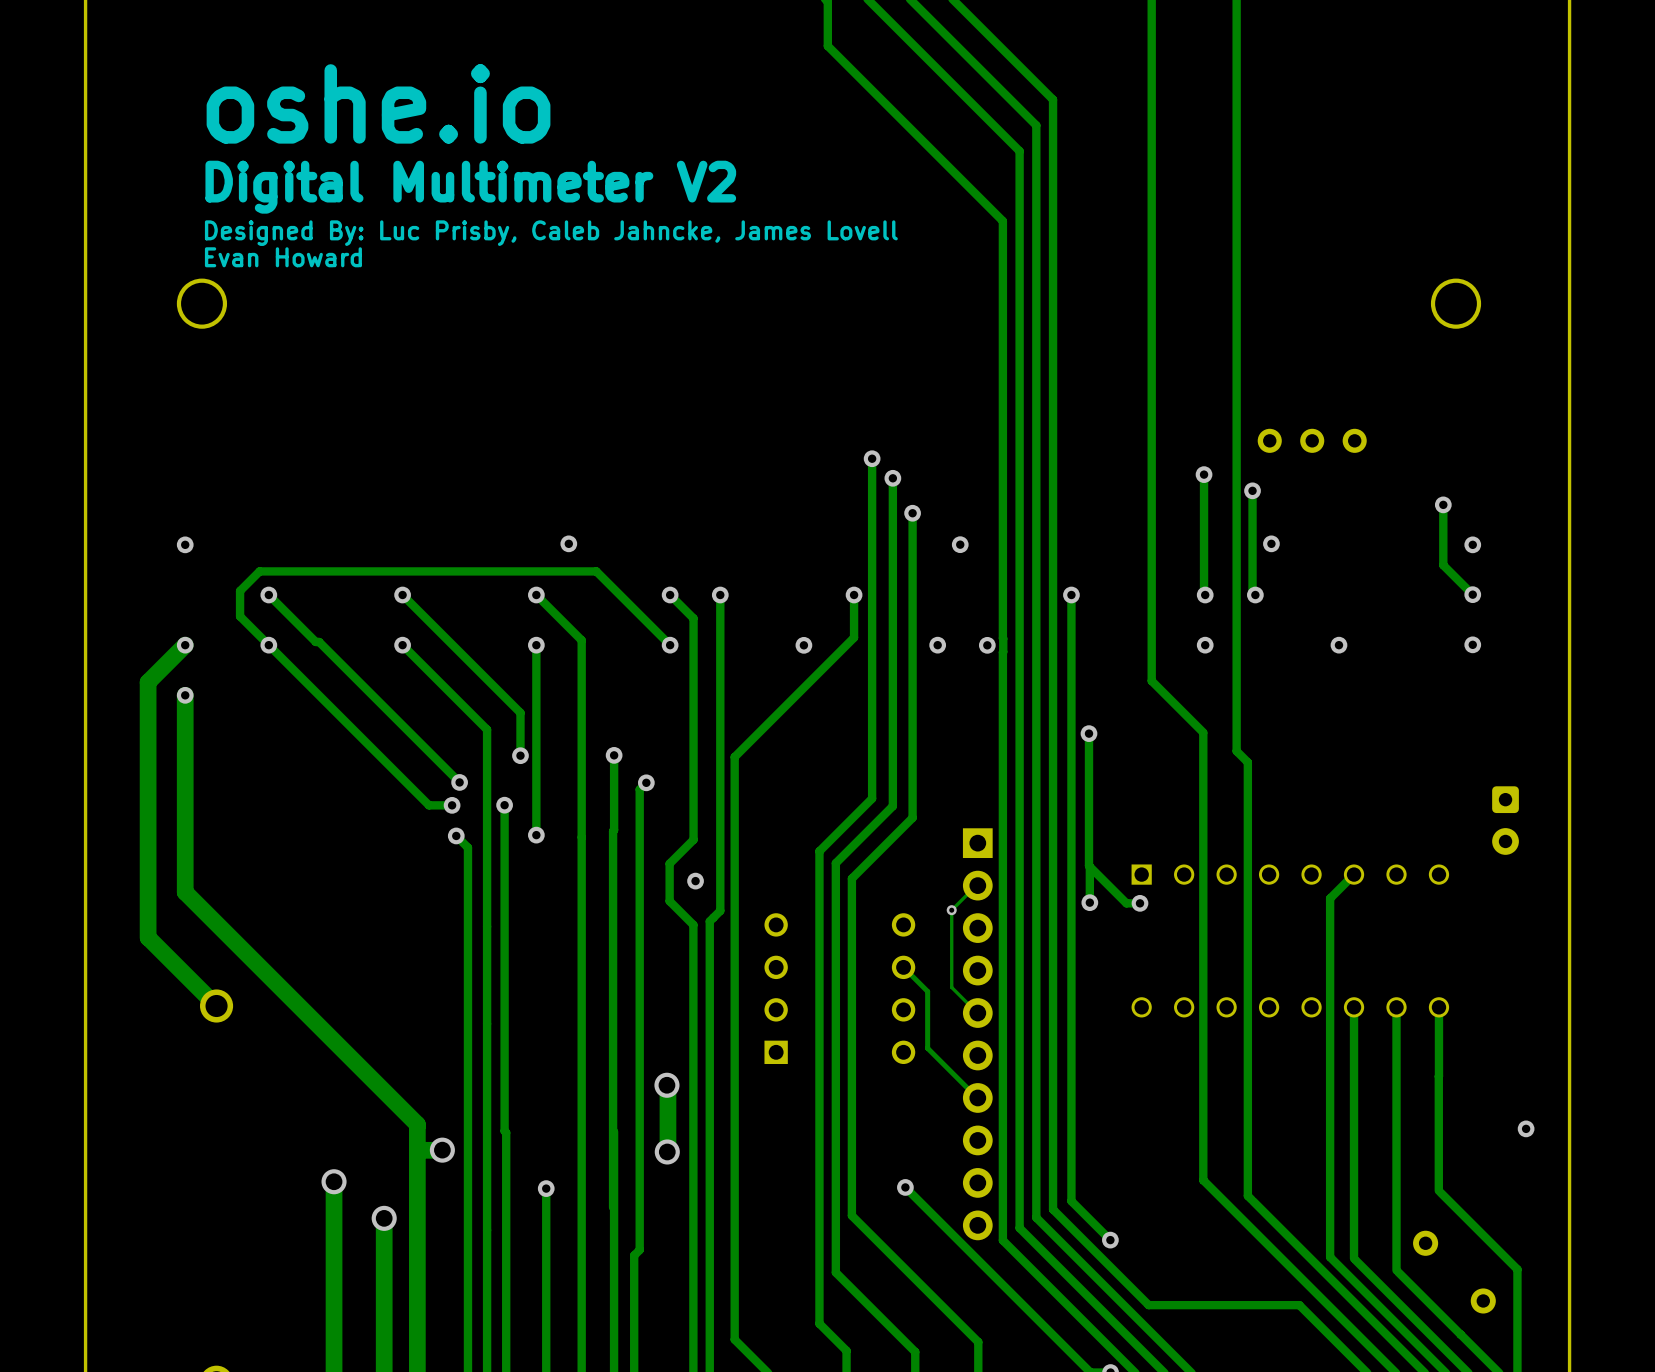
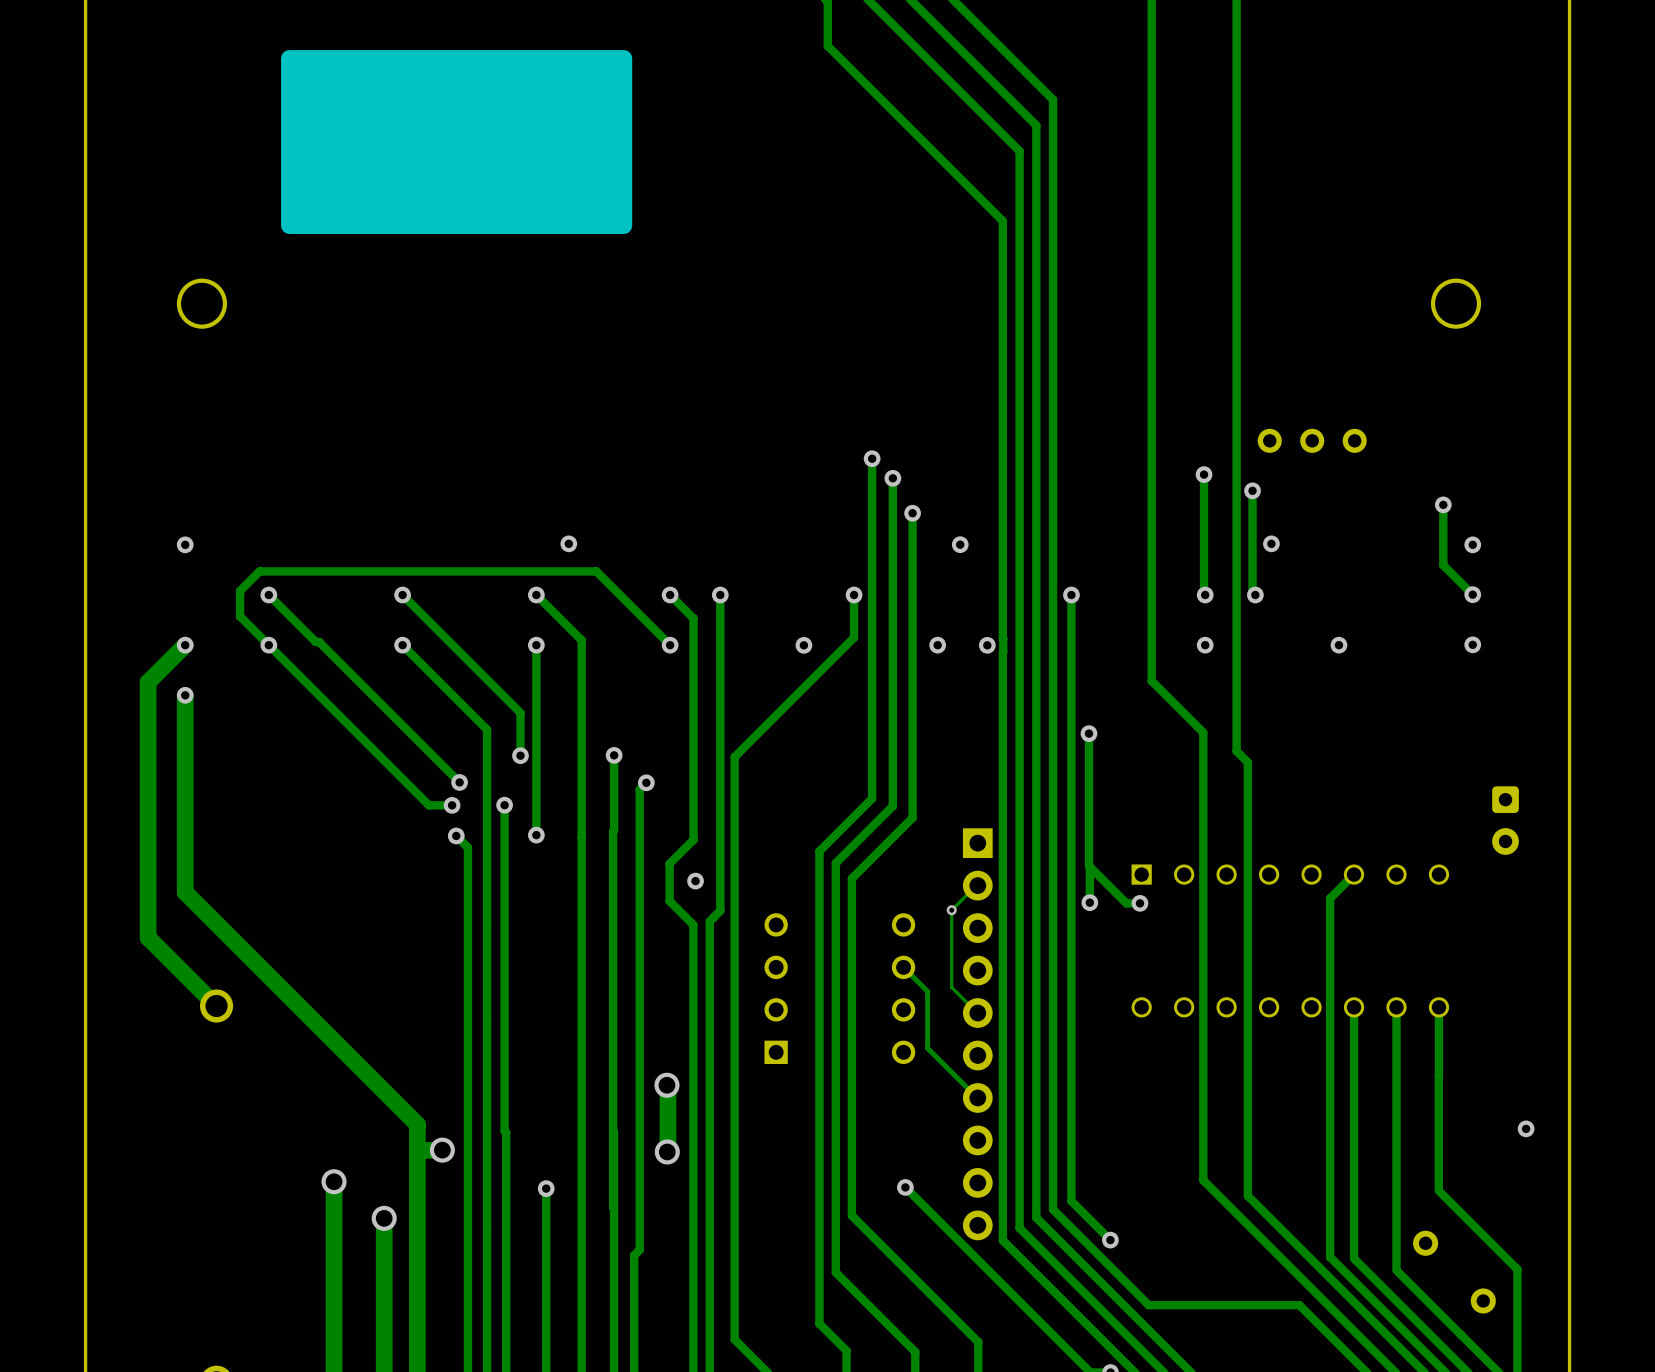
drawing: none -> [281, 50, 633, 235]
text: oshe.io (378, 103) -> none
text: Digital Multimeter V2 (470, 187) -> none
text: Designed By: Luc Prisby, Caleb Jahncke, James Lovell (551, 233) -> none
text: Evan Howard (283, 257) -> none

